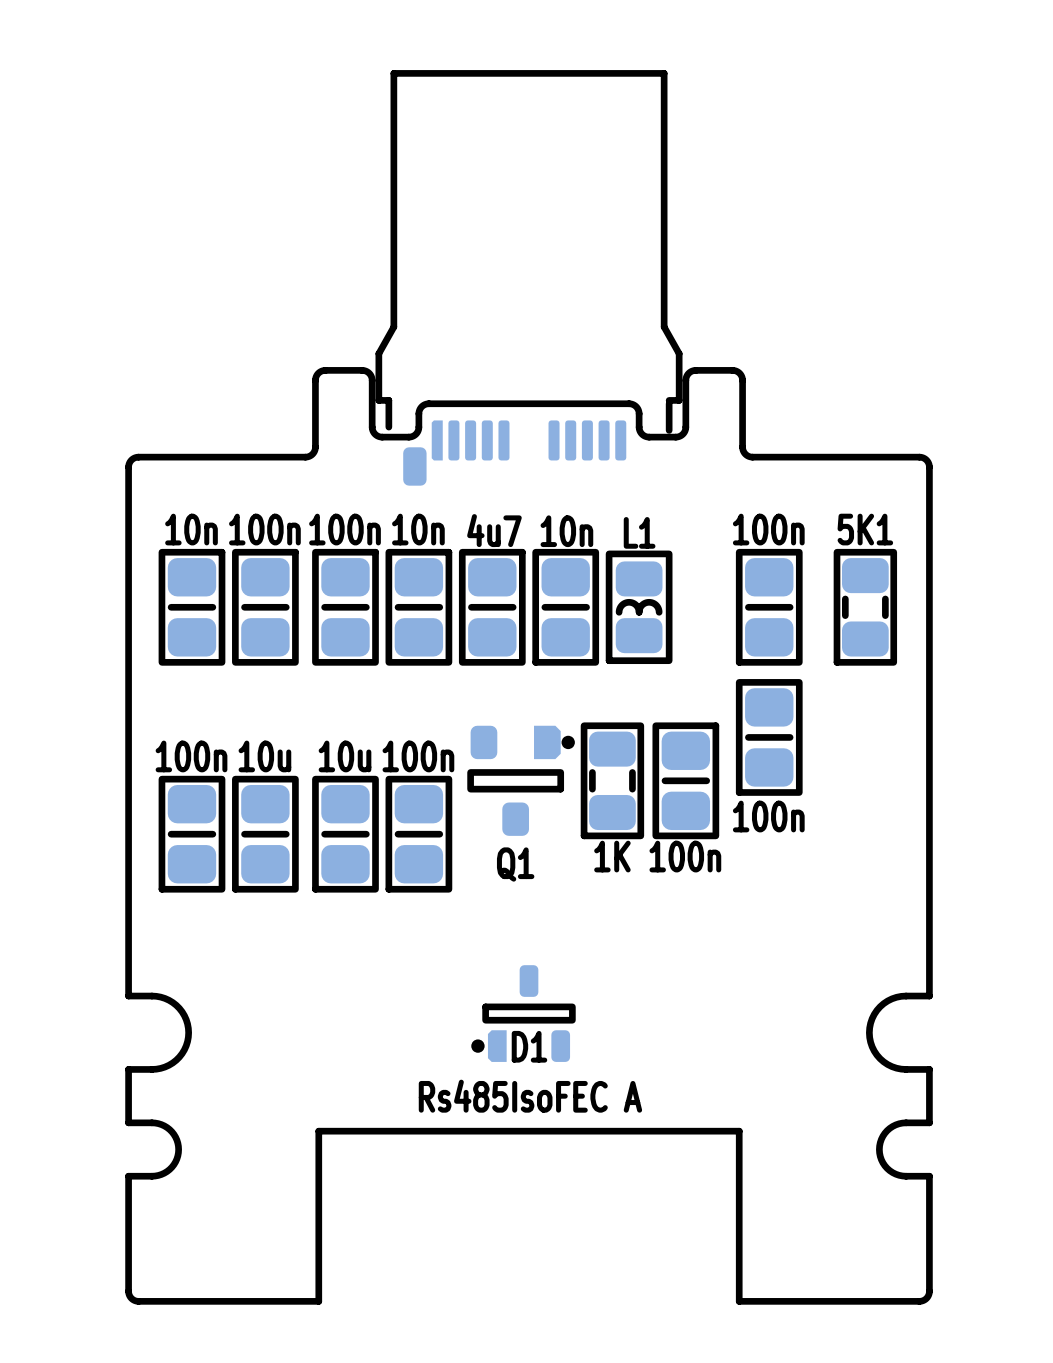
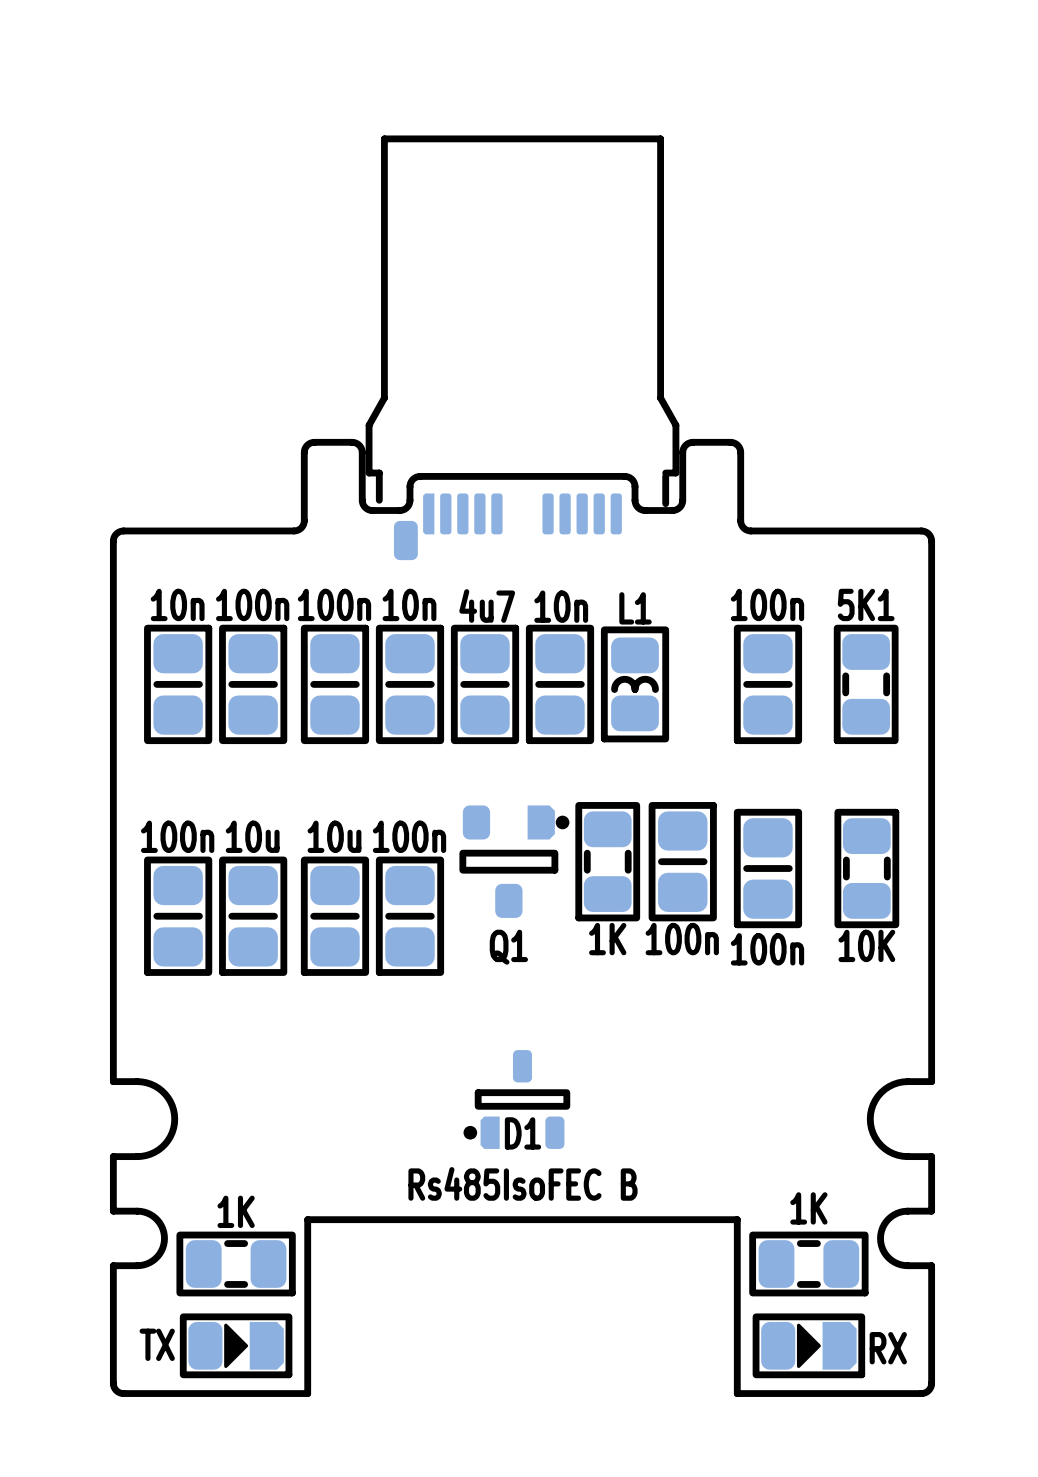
part position: (769, 737) -> (767, 868)
part: none -> 10K (866, 868)
text: Rs485IsoFEC A (530, 1096) -> Rs485IsoFEC B (522, 1183)
part: none -> 1K (236, 1264)
part: none -> 1K (808, 1264)
part: none -> TX (236, 1345)
part: none -> RX (808, 1345)

